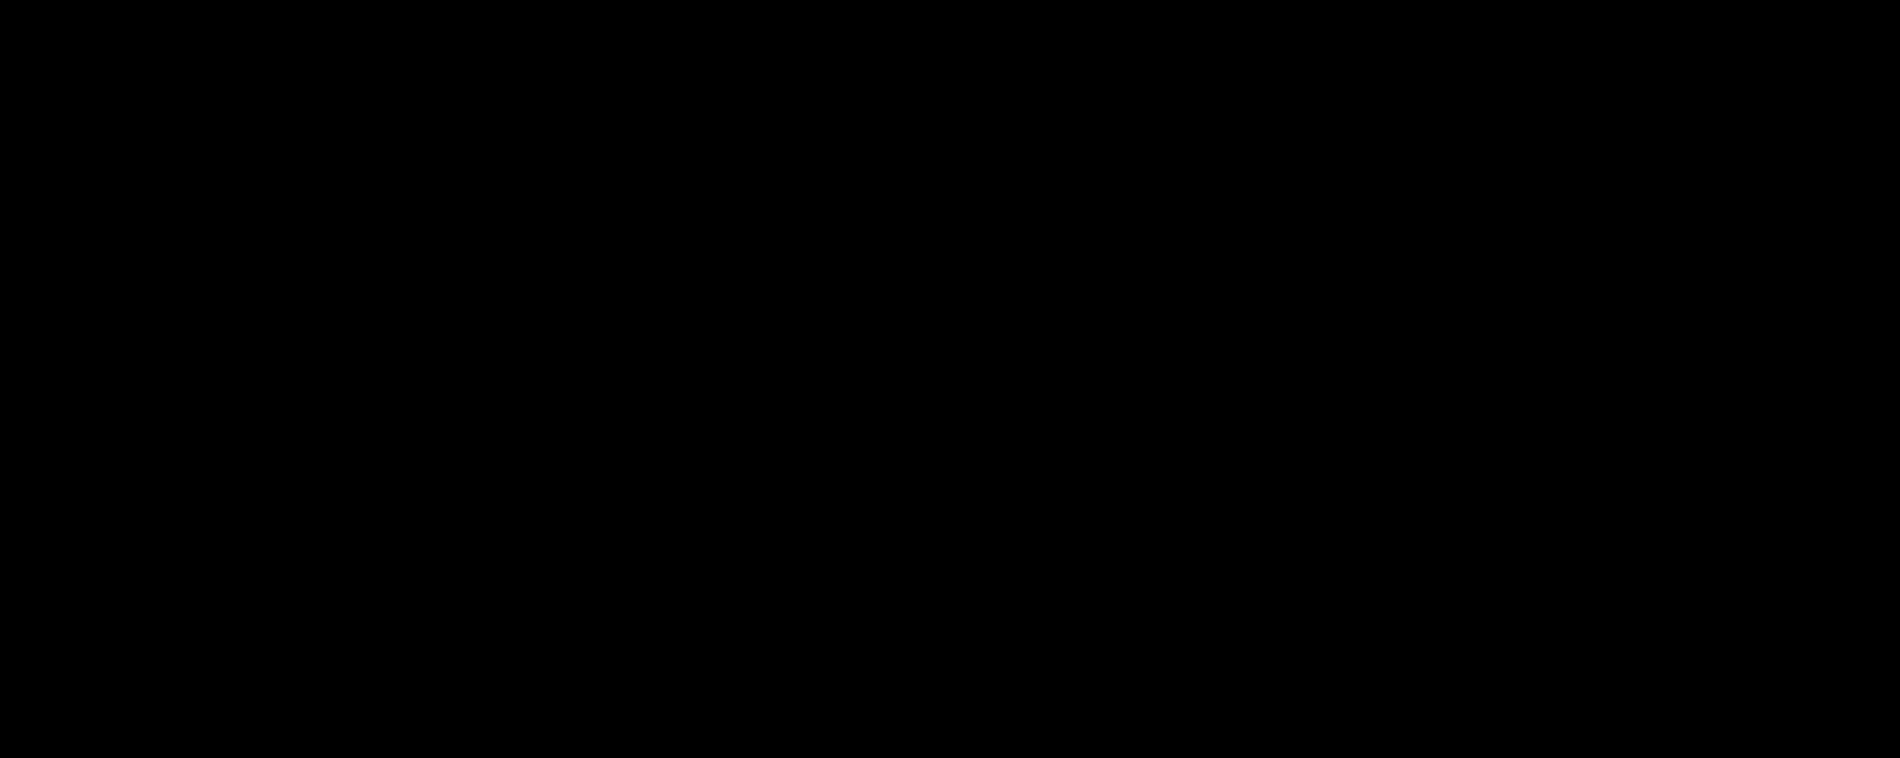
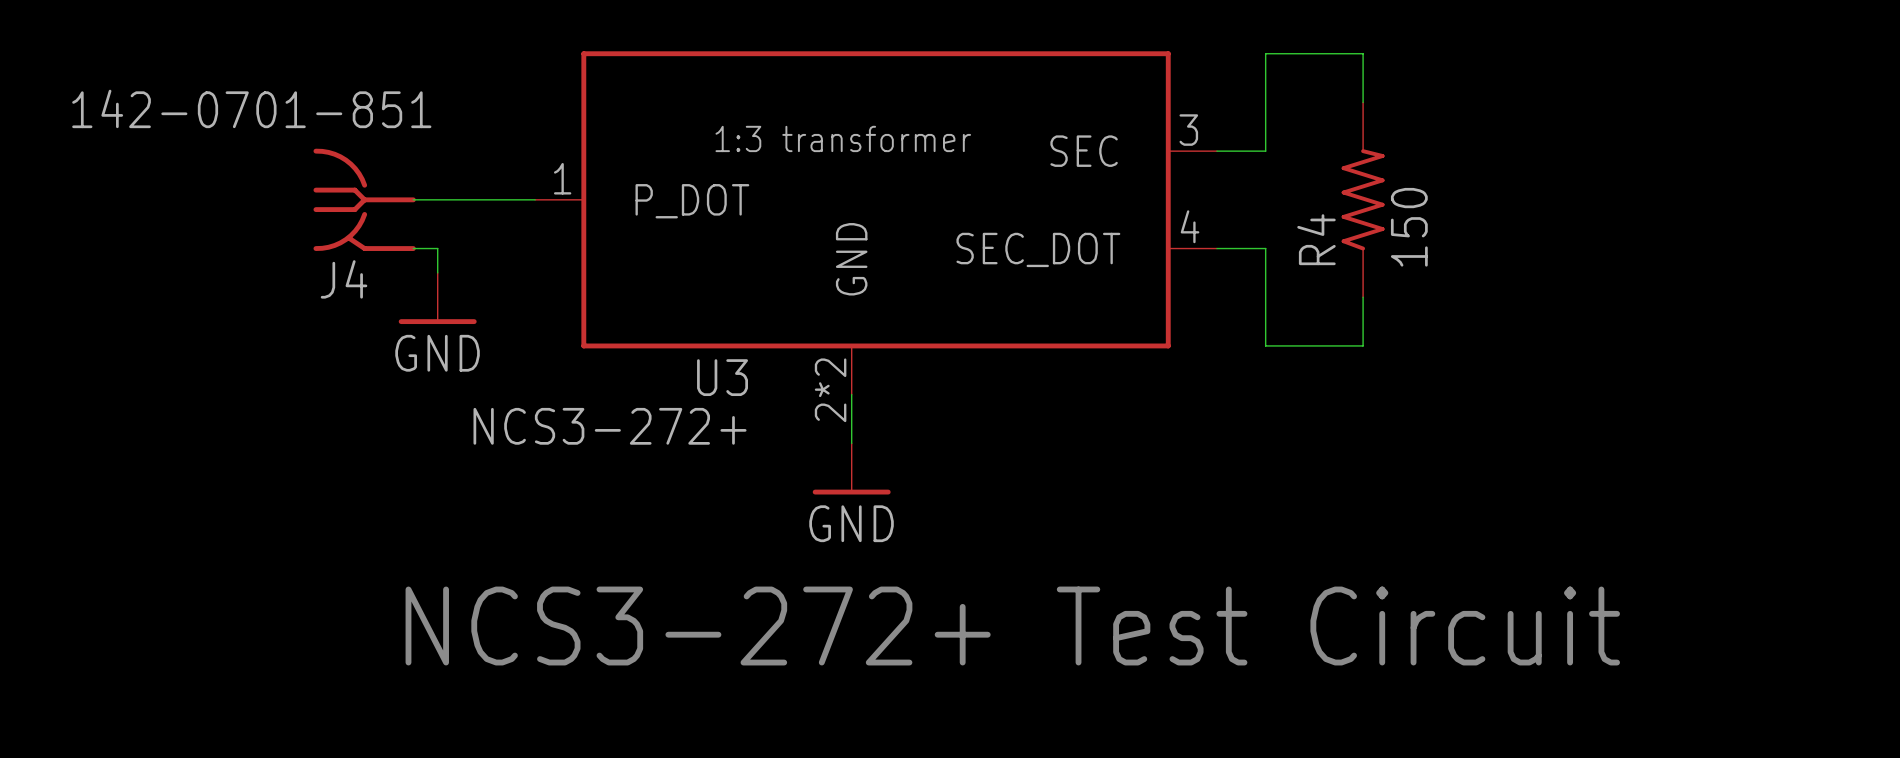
wire: none -> (1363, 102) (1363, 53) (1265, 53) (1265, 151) (1216, 151)
J4: none -> 142-0701-851 (364, 199)
wire: none -> (413, 199) (535, 199)
R4: none -> 150 (1363, 199)
U3: none -> NCS3-272+ (876, 222)
wire: none -> (413, 248) (437, 248) (437, 272)
wire: none -> (1216, 248) (1265, 248) (1265, 345) (1363, 345) (1363, 297)
power symbol: none -> GND (437, 298)
wire: none -> (851, 394) (851, 443)
power symbol: none -> GND (851, 468)
text: none -> NCS3-272+ Test Circuit (1012, 626)

